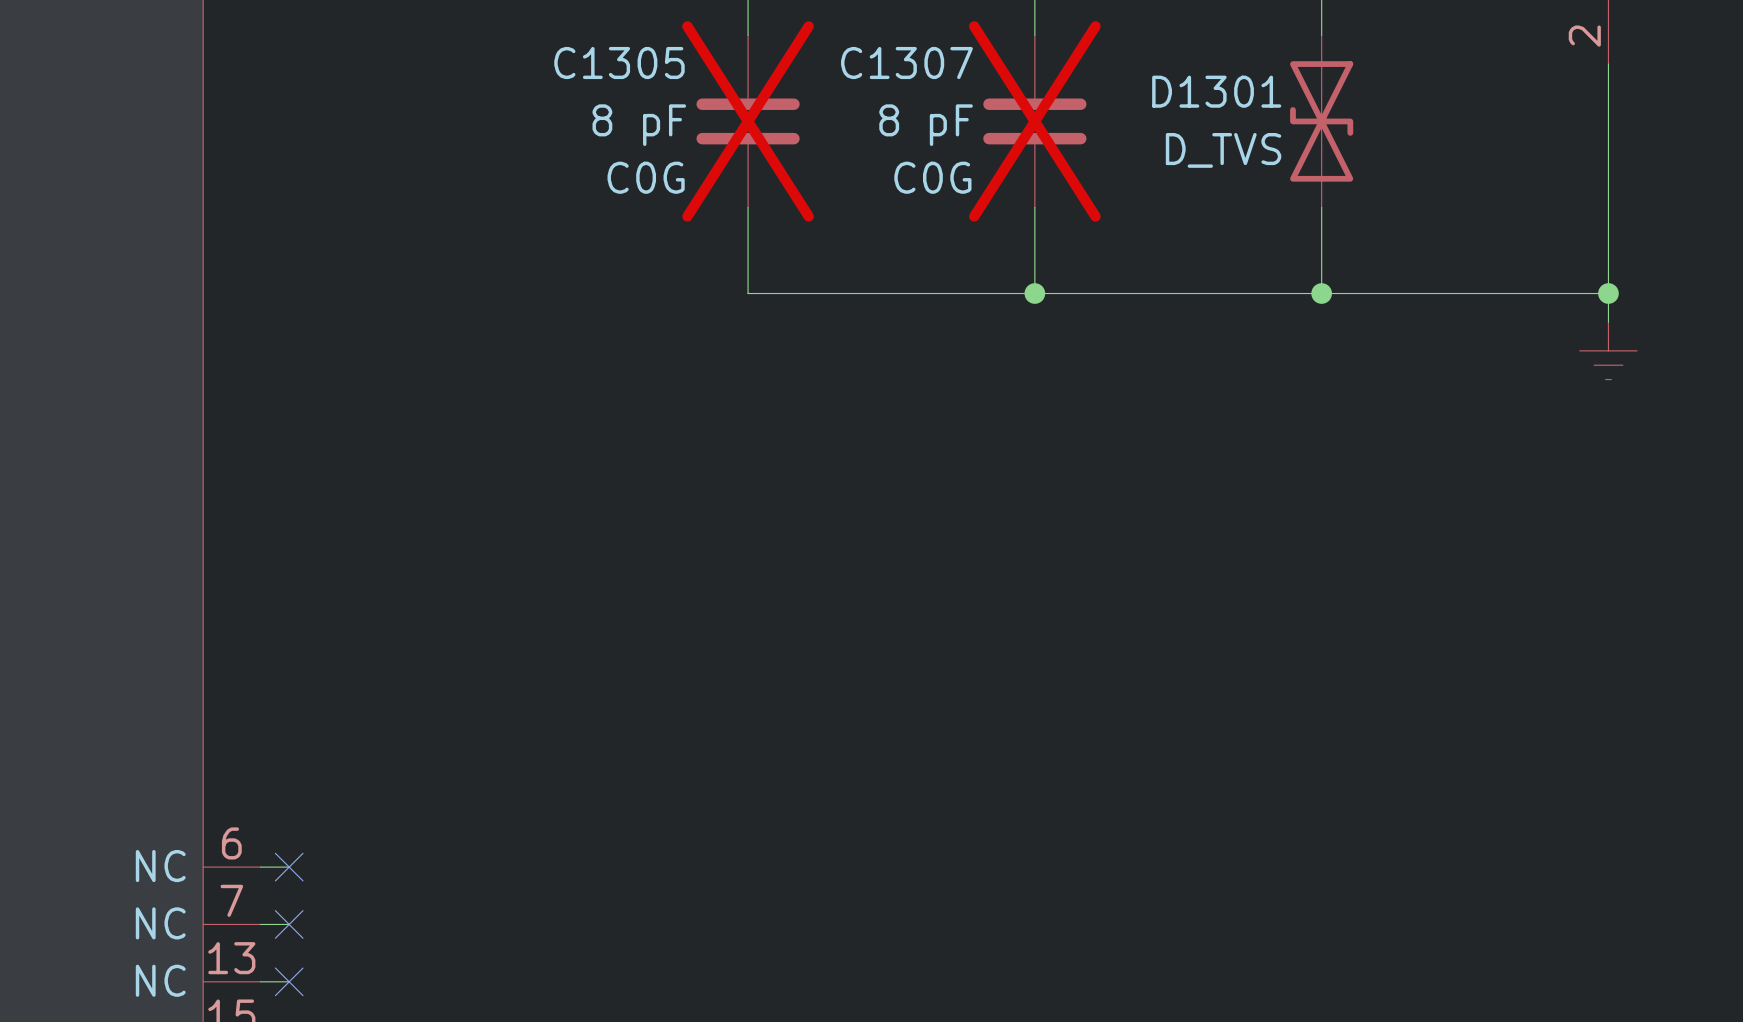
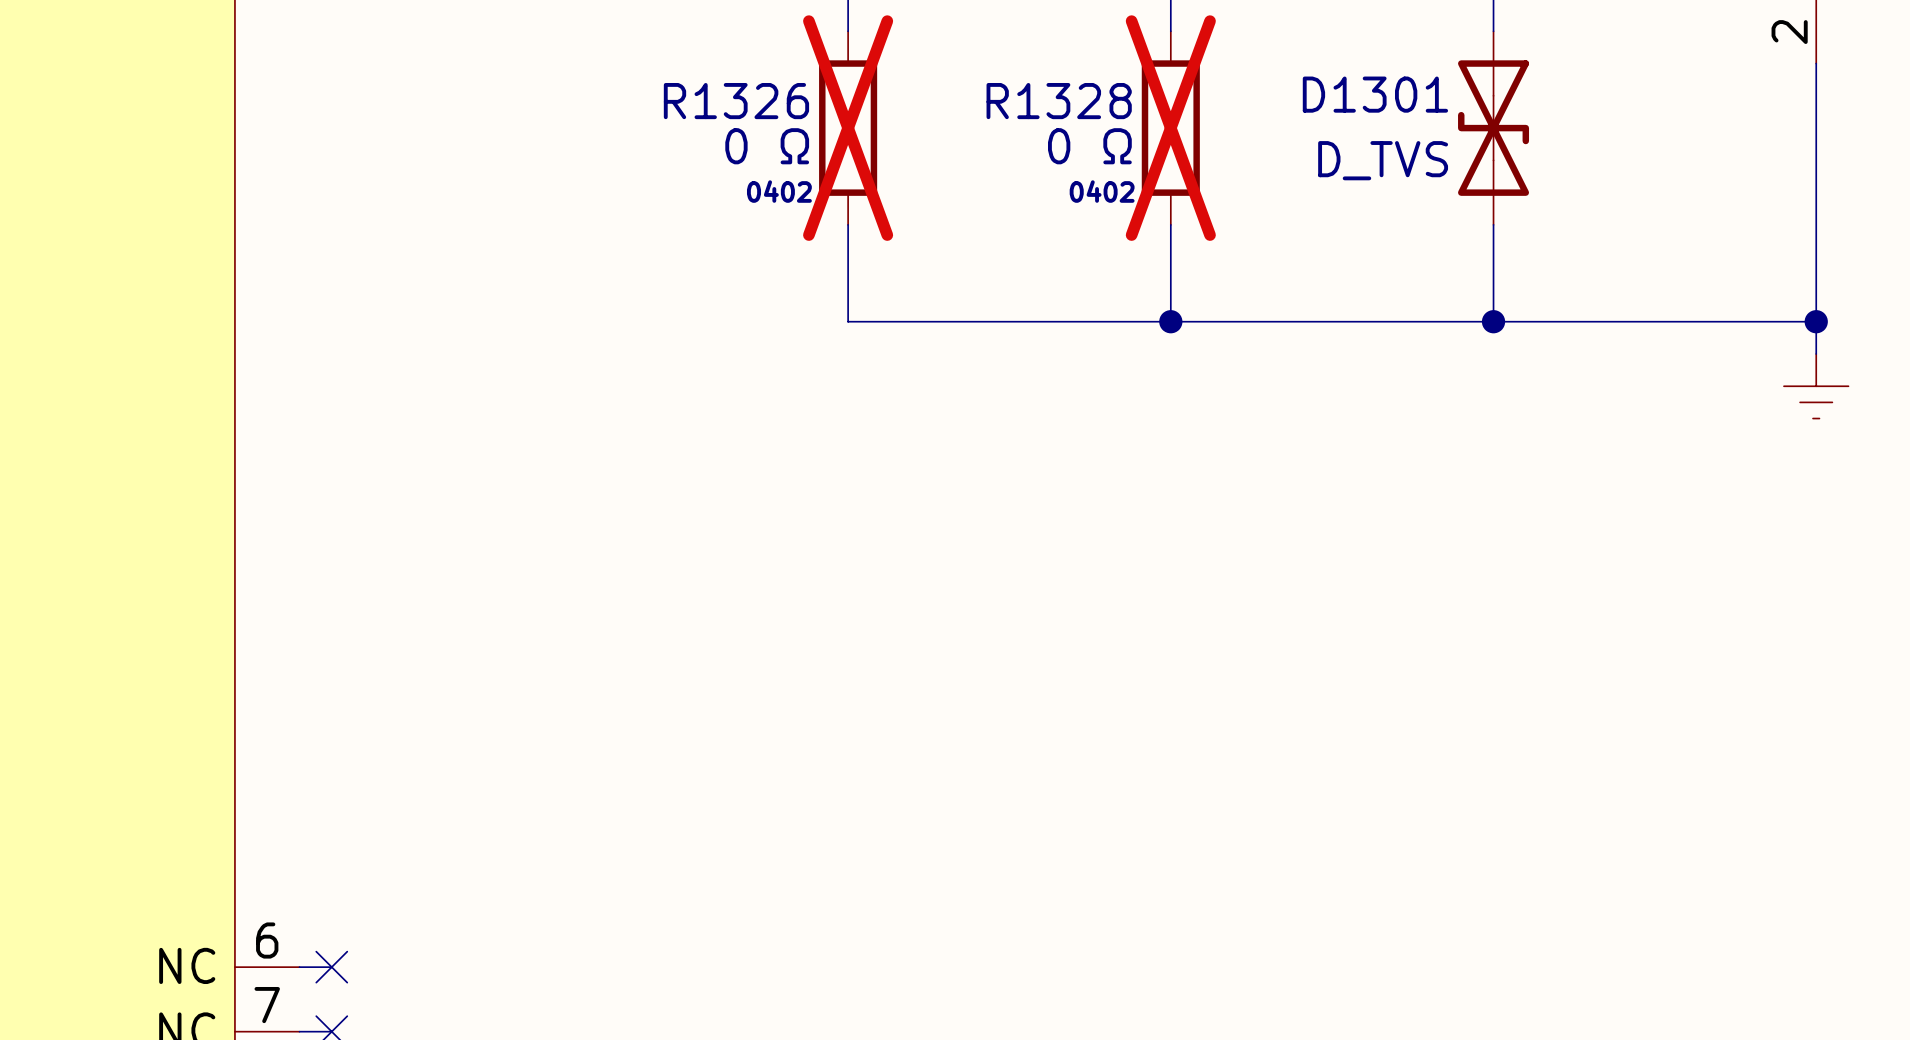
C1305: 8 pF (748, 121) -> none
R1326: none -> 0 Ω (848, 128)
C1307: 8 pF (1034, 121) -> none
R1328: none -> 0 Ω (1170, 128)

